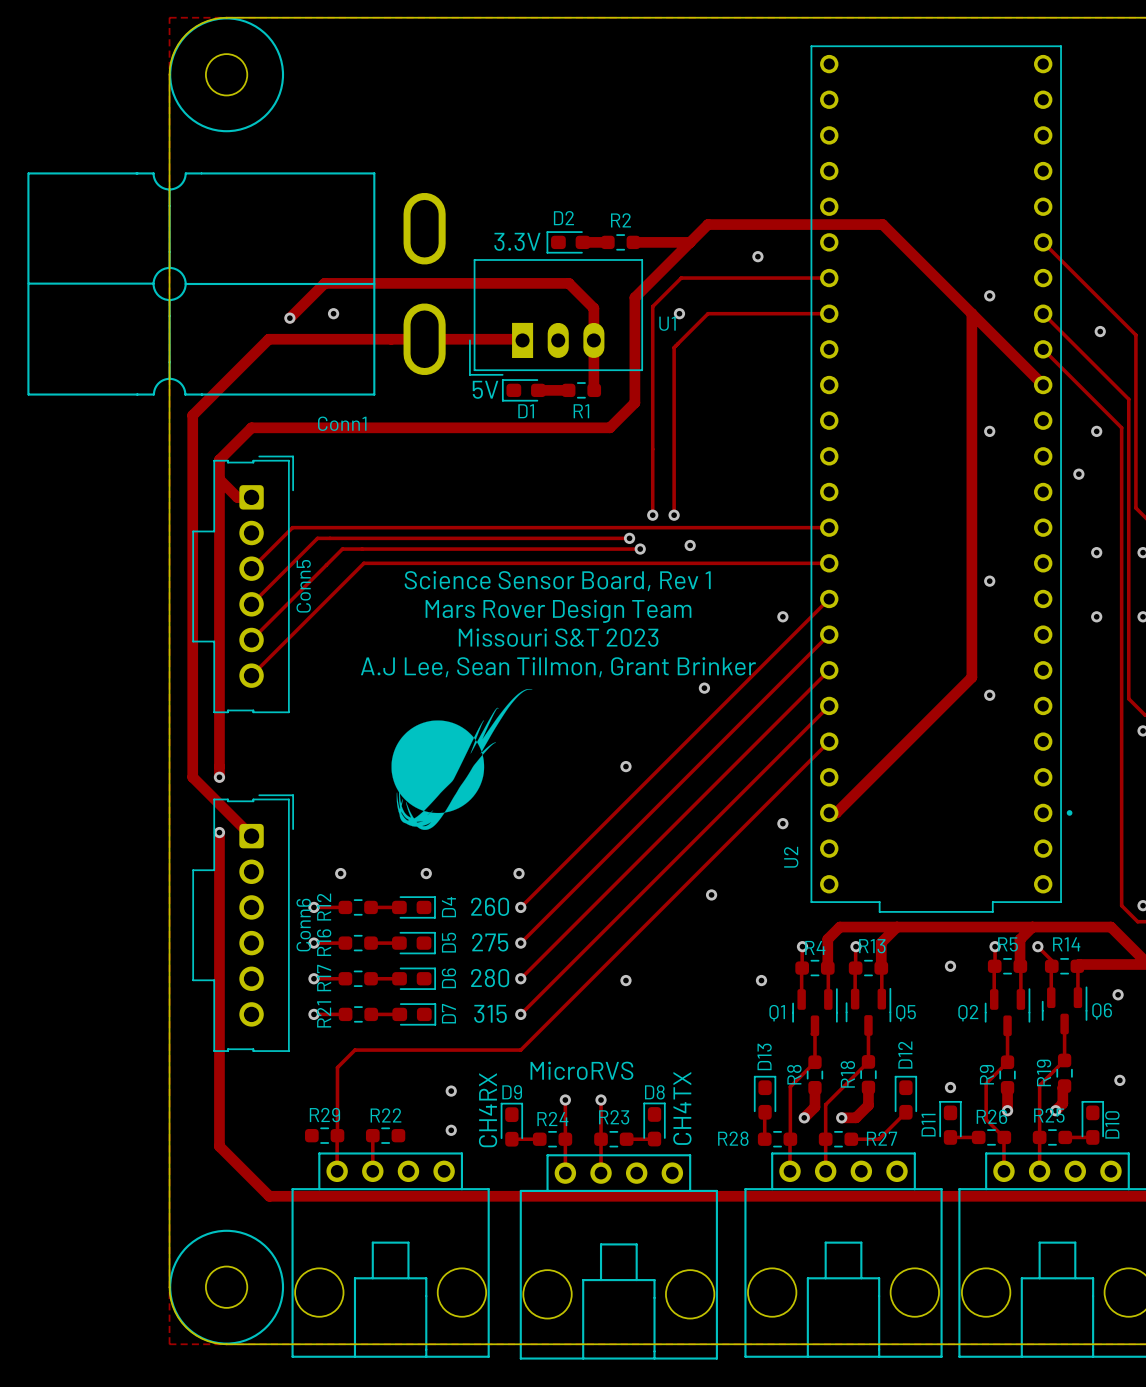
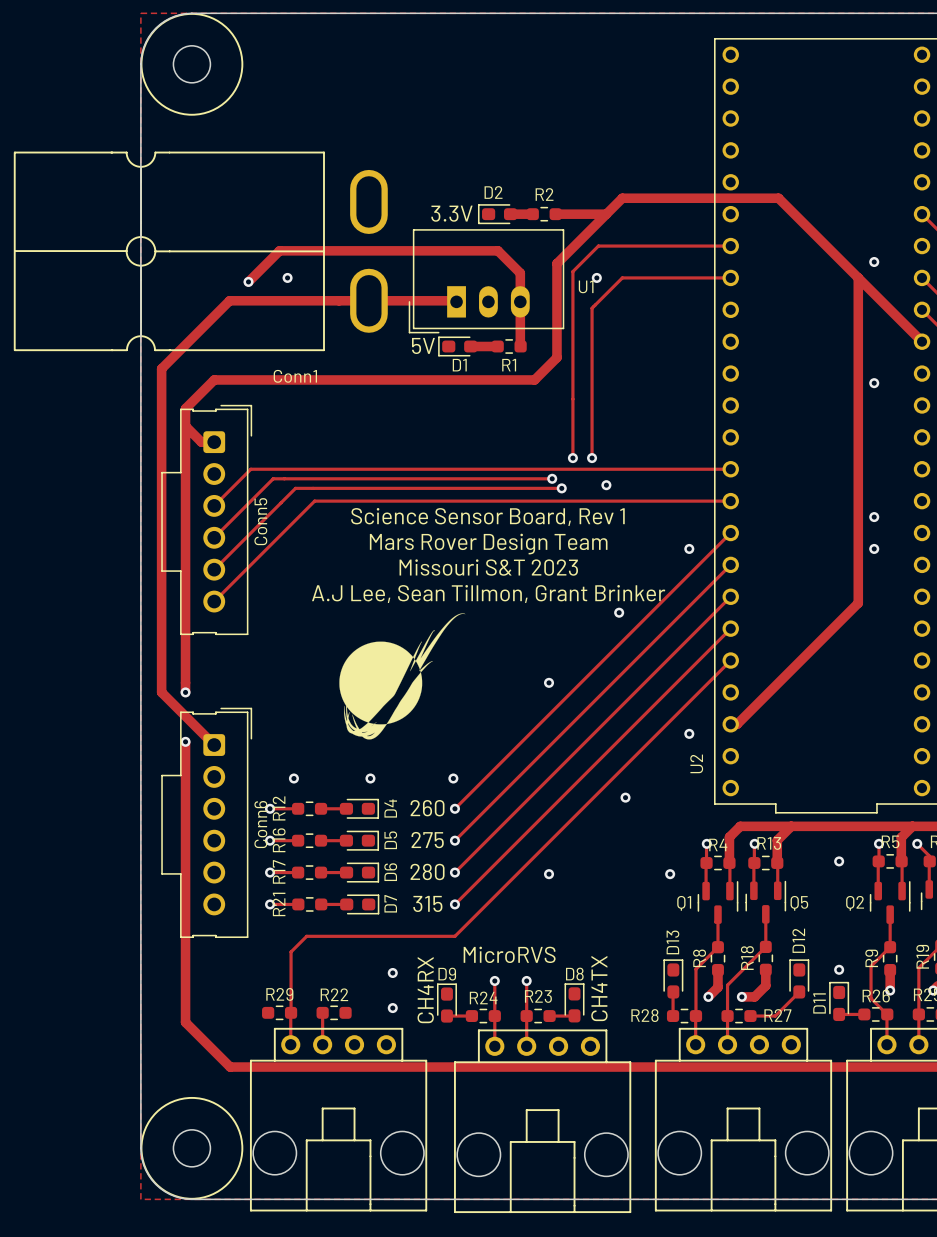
via: (757, 256) -> none
via position: (989, 695) -> (874, 548)

